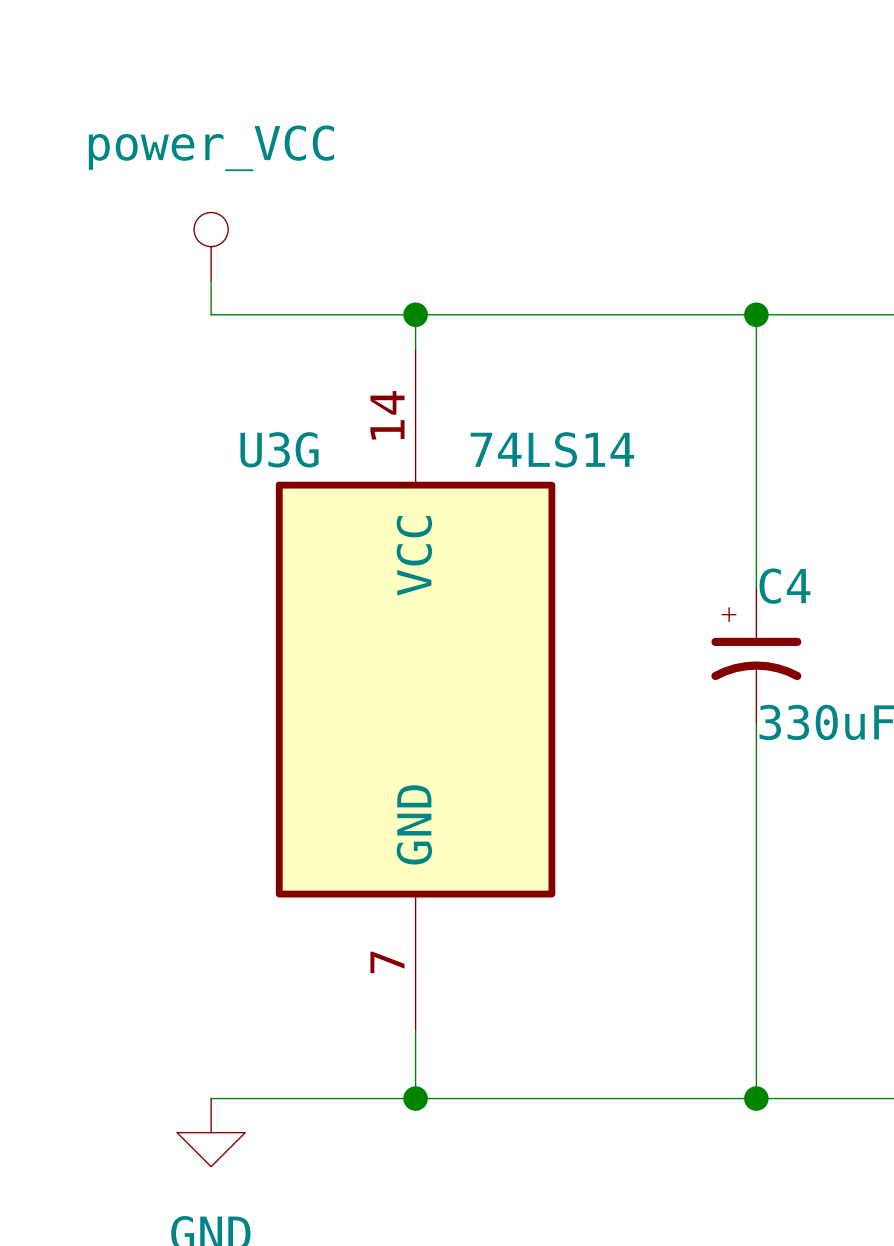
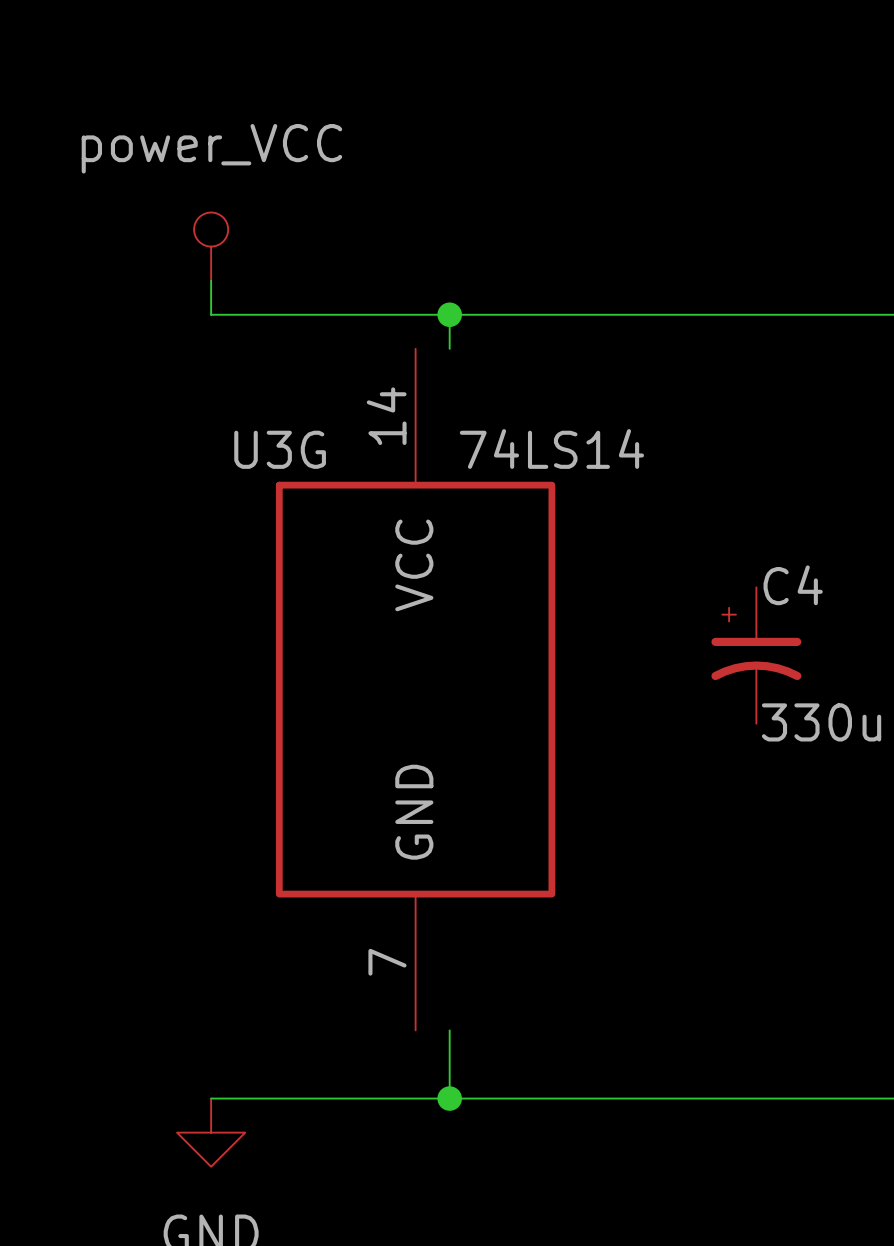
wire: (415, 314) (415, 348) -> (449, 314) (449, 348)
junction position: (415, 314) -> (449, 314)
wire: (756, 314) (756, 587) -> none
junction: (756, 314) -> none
wire: (756, 723) (756, 1098) -> none
wire: (415, 1030) (415, 1098) -> (449, 1030) (449, 1098)
junction position: (415, 1098) -> (449, 1098)
junction: (756, 1098) -> none

